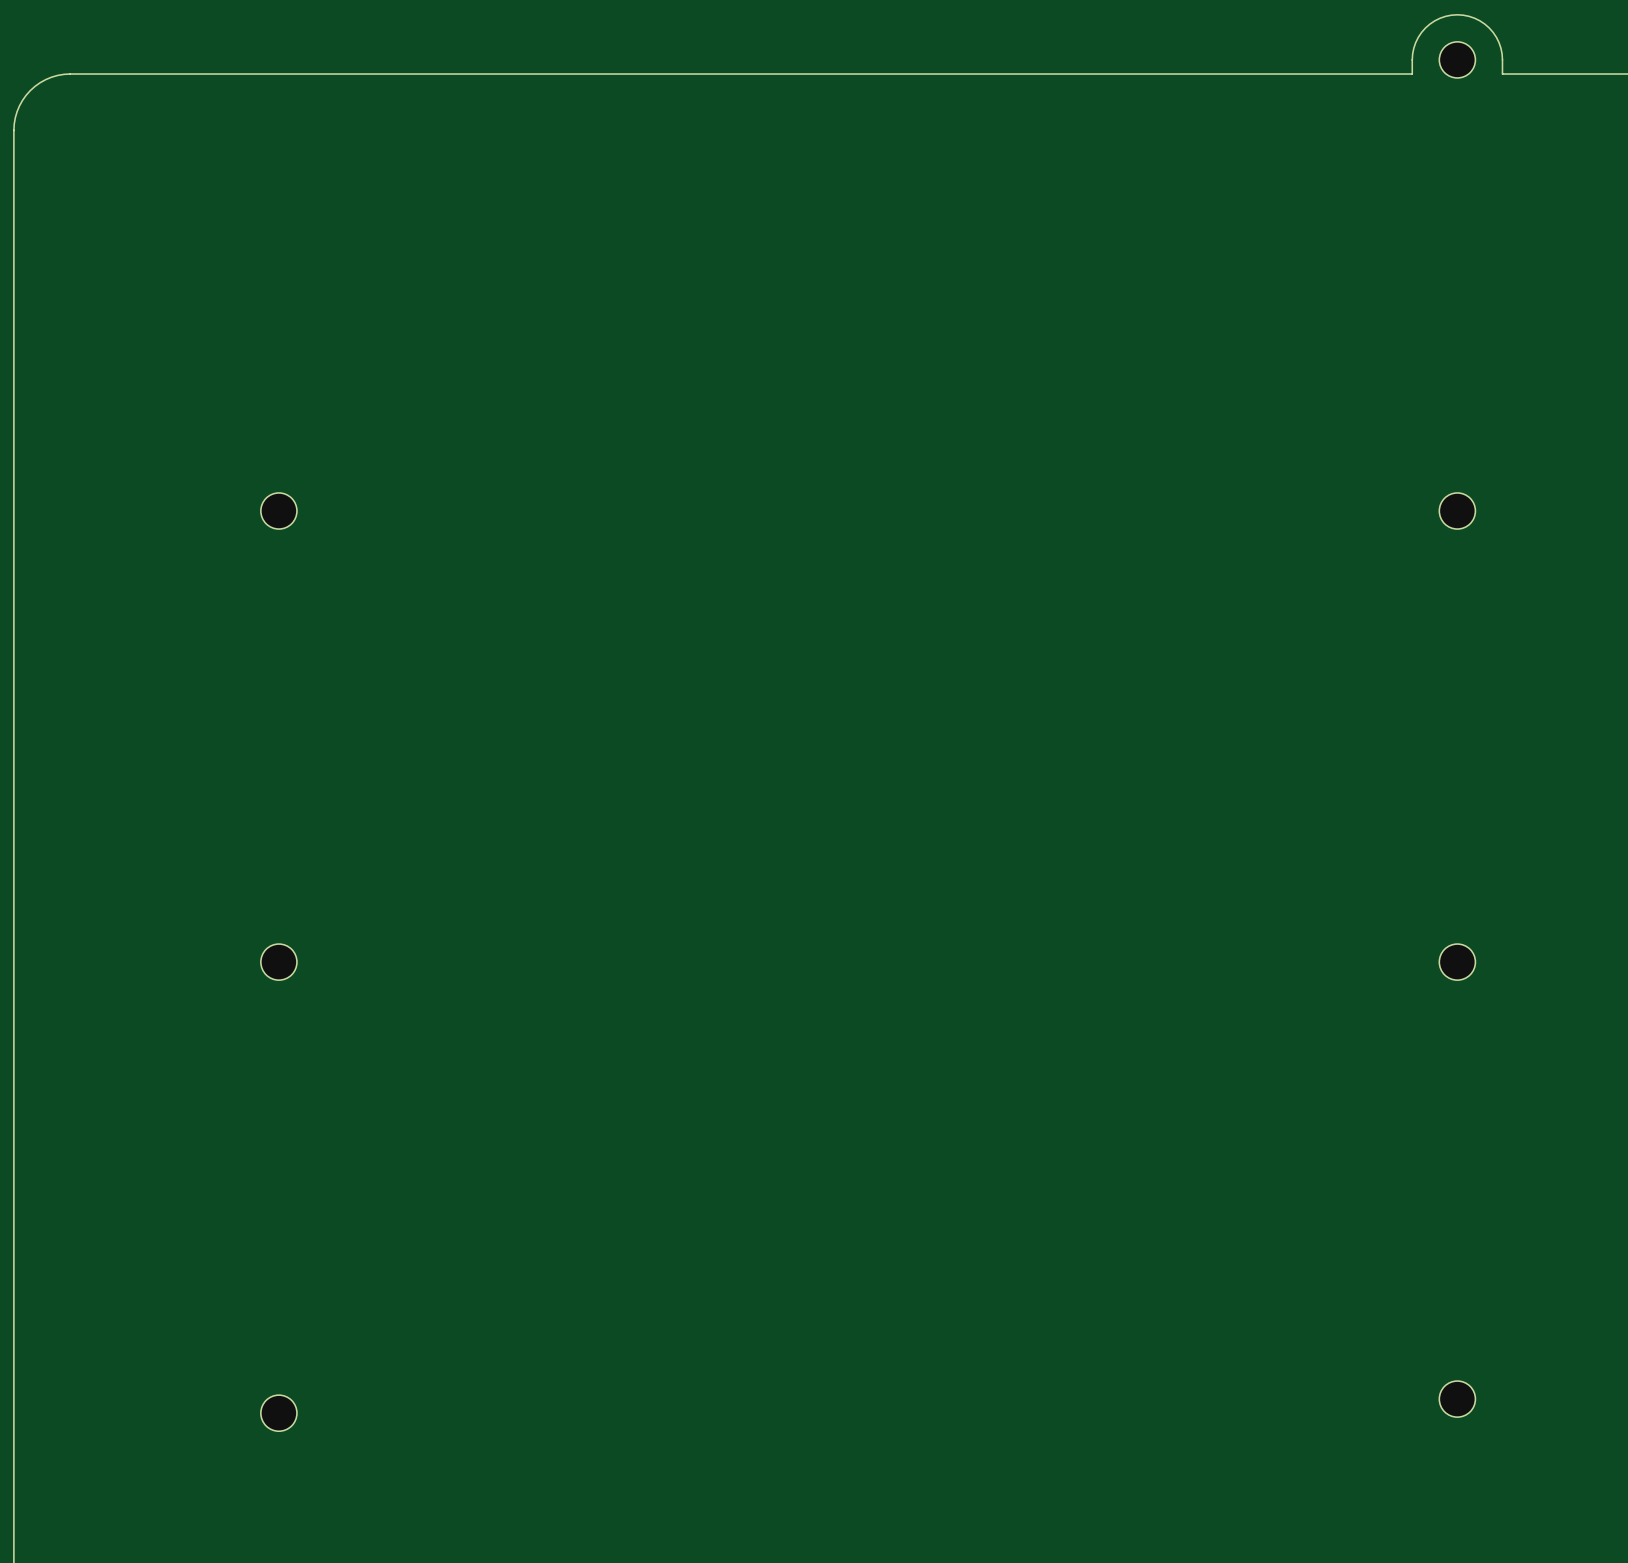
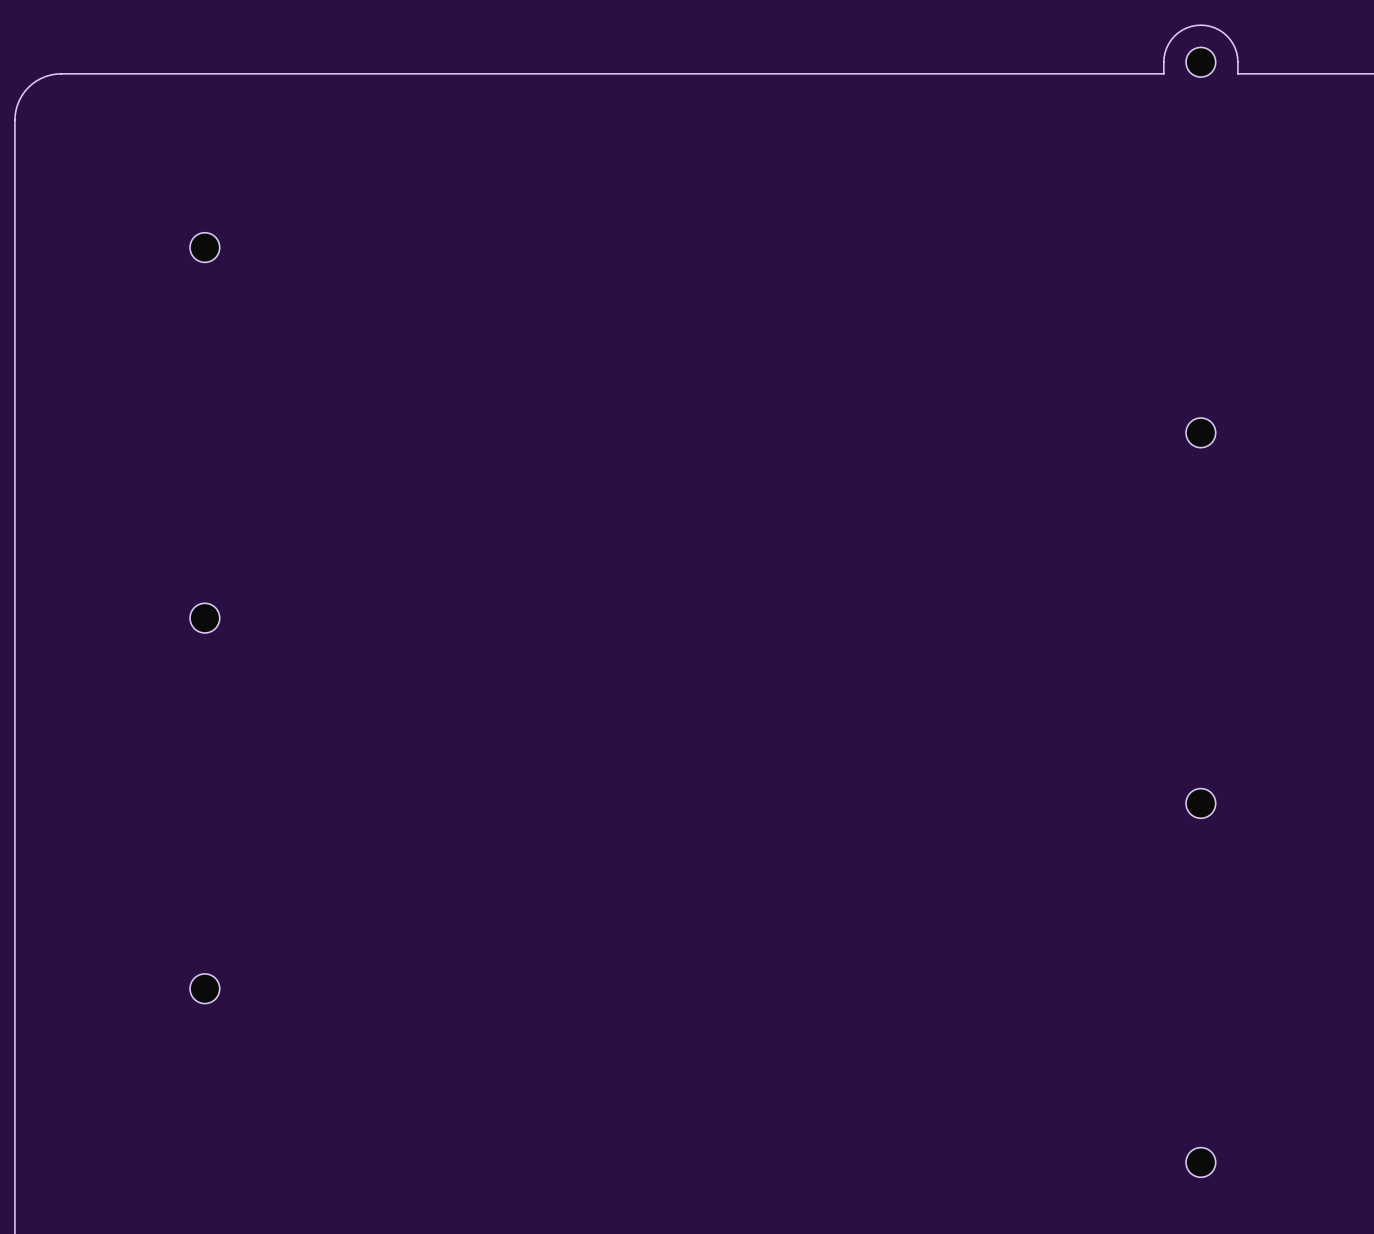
part: none -> (204, 247)
part: (278, 511) -> none
part: none -> (204, 618)
part: (278, 962) -> none
part: none -> (204, 988)
part: (278, 1413) -> none

